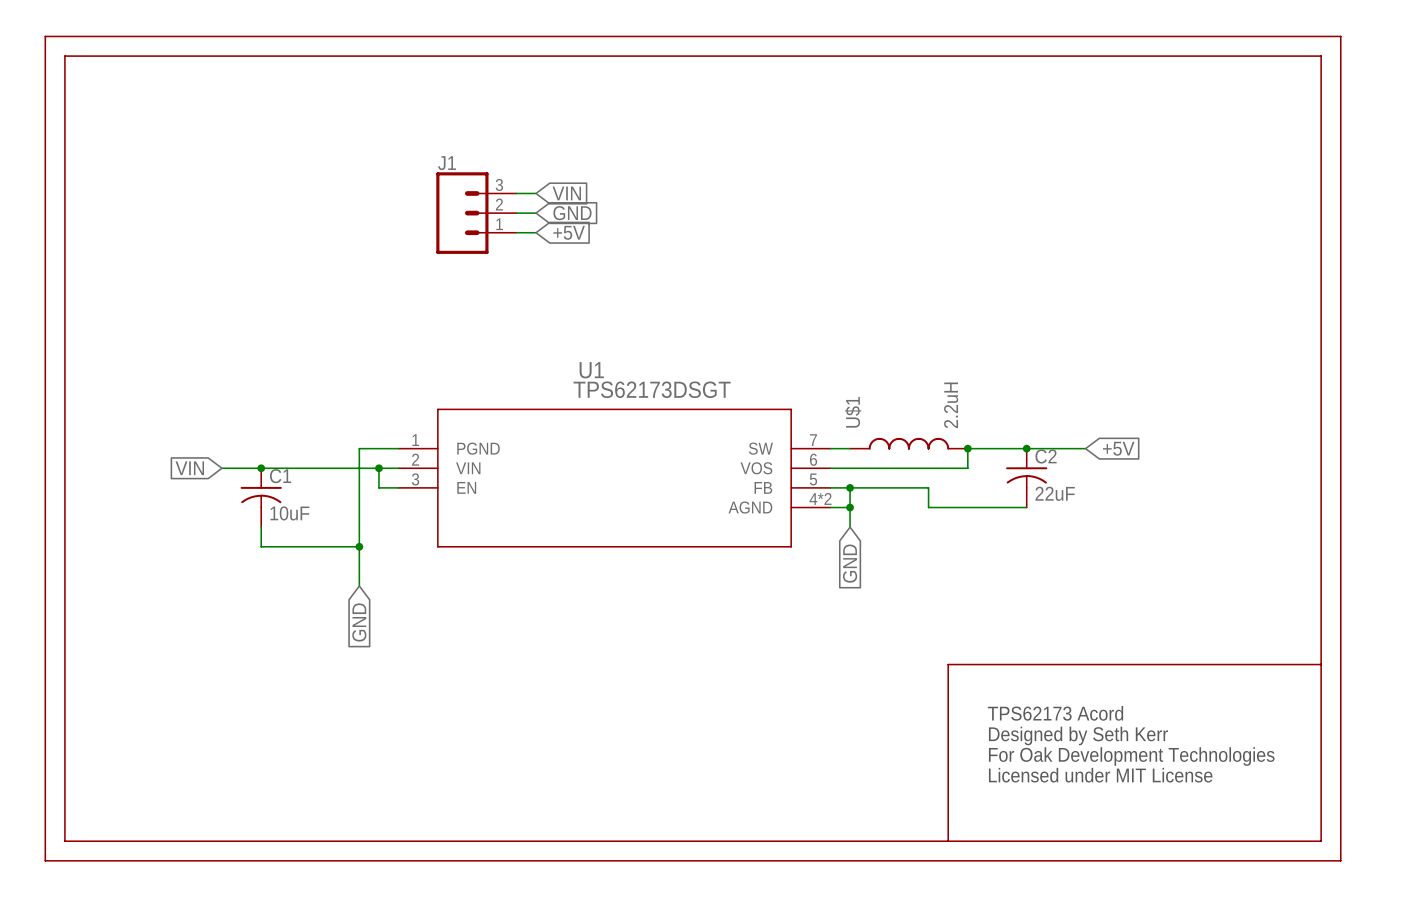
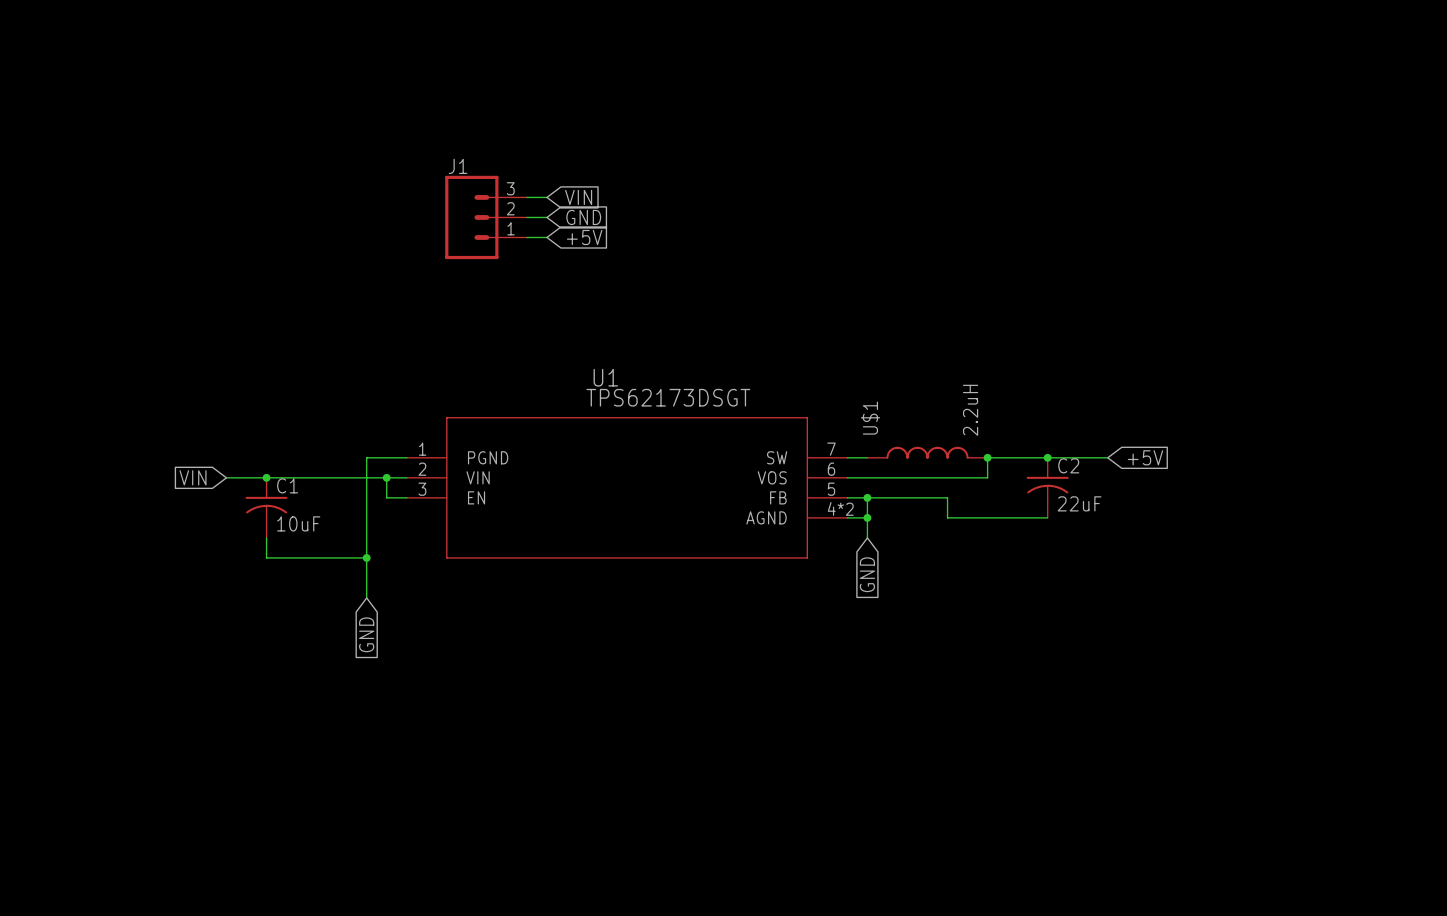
line: (45, 36) (1340, 36) (1340, 860) (45, 860) (45, 36) -> none
line: (64, 56) (1321, 56) (1321, 841) (64, 841) (64, 56) -> none
line: (1321, 664) (948, 664) (948, 841) -> none
text: TPS62173 Acord (1055, 713) -> none
text: Designed by Seth Kerr (1078, 735) -> none
text: For Oak Development Technologies (1131, 756) -> none
text: Licensed under MIT License (1100, 775) -> none

